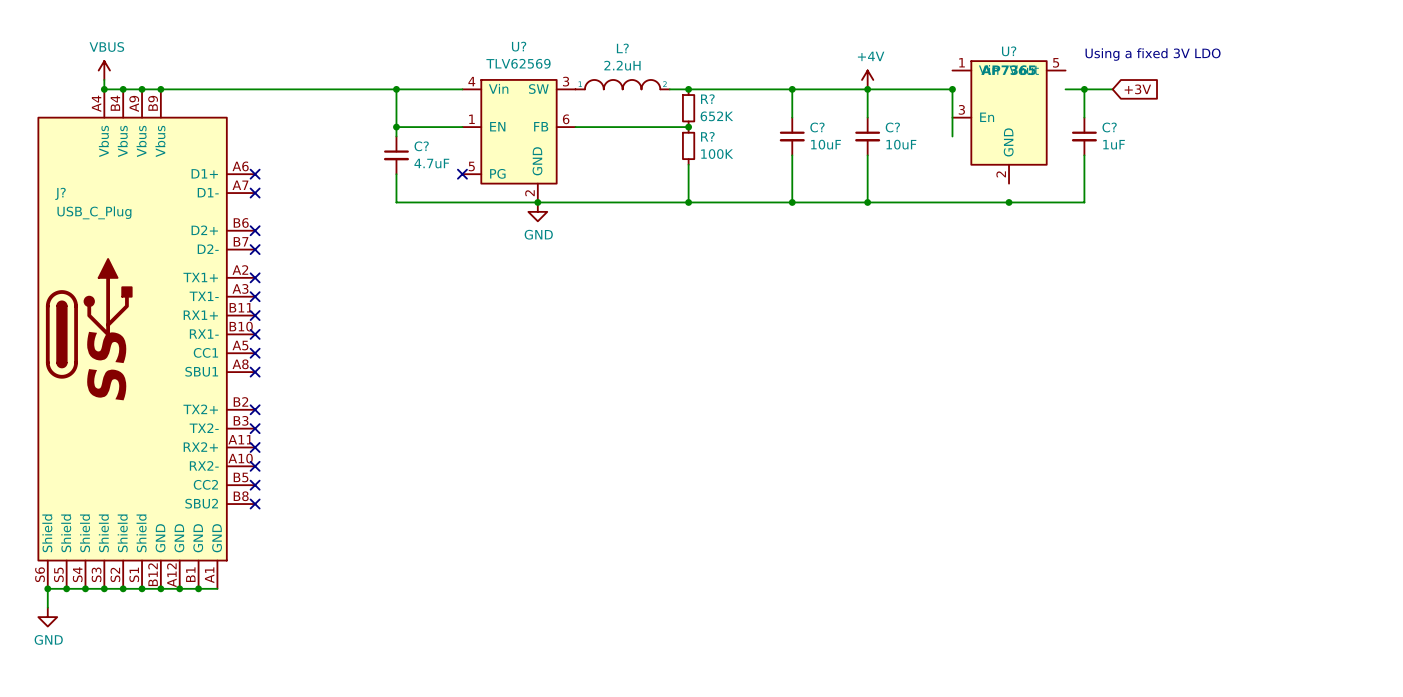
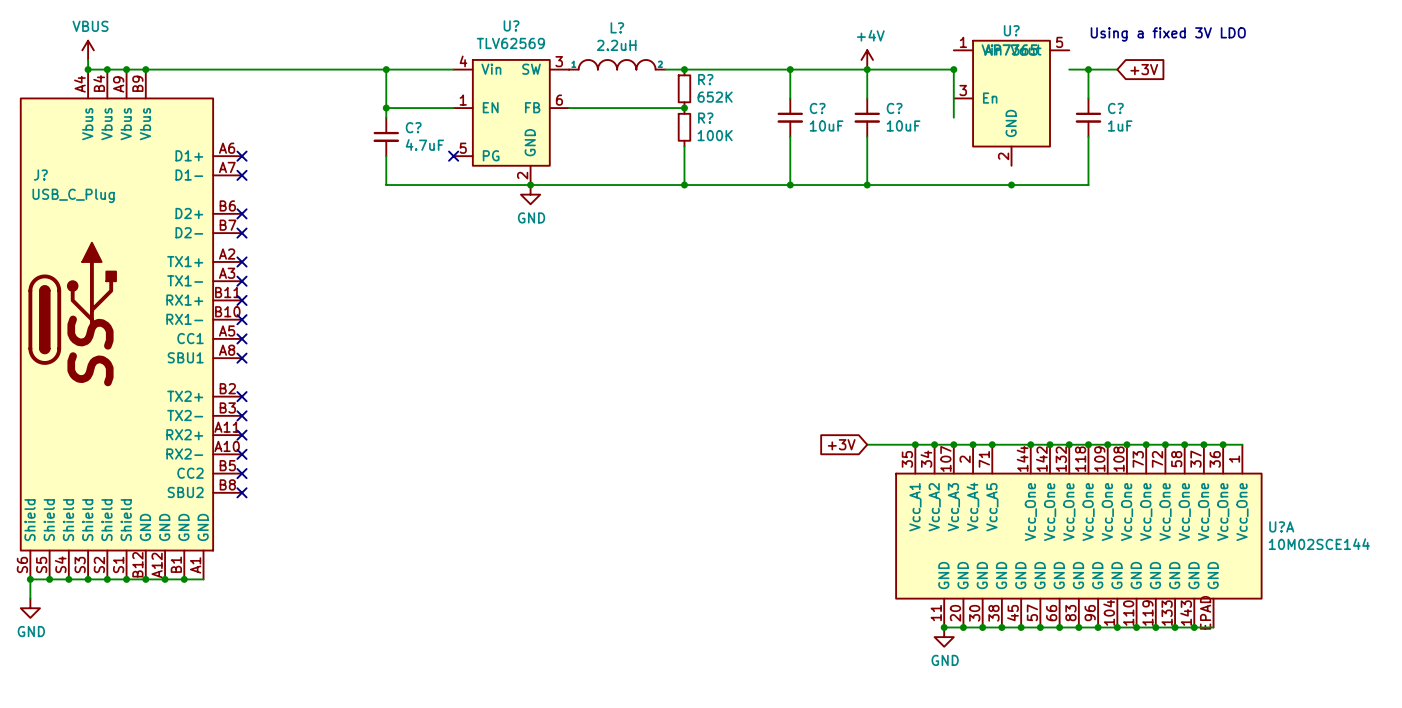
global label: none -> +3V (841, 444)
wire: none -> (867, 444) (1242, 444)
junction: none -> (915, 444)
junction: none -> (934, 444)
junction: none -> (953, 444)
junction: none -> (973, 444)
junction: none -> (992, 444)
junction: none -> (1030, 444)
junction: none -> (1050, 444)
junction: none -> (1069, 444)
junction: none -> (1088, 444)
junction: none -> (1107, 444)
junction: none -> (1126, 444)
junction: none -> (1146, 444)
junction: none -> (1165, 444)
junction: none -> (1184, 444)
junction: none -> (1203, 444)
junction: none -> (1223, 444)
U?A: none -> 10M02SCE144 (1078, 536)
wire: none -> (944, 627) (1213, 627)
junction: none -> (944, 627)
junction: none -> (963, 627)
junction: none -> (982, 627)
junction: none -> (1001, 627)
junction: none -> (1021, 627)
junction: none -> (1040, 627)
junction: none -> (1059, 627)
junction: none -> (1078, 627)
junction: none -> (1098, 627)
junction: none -> (1117, 627)
junction: none -> (1136, 627)
junction: none -> (1155, 627)
junction: none -> (1175, 627)
junction: none -> (1194, 627)
power symbol: none -> GND (944, 637)

